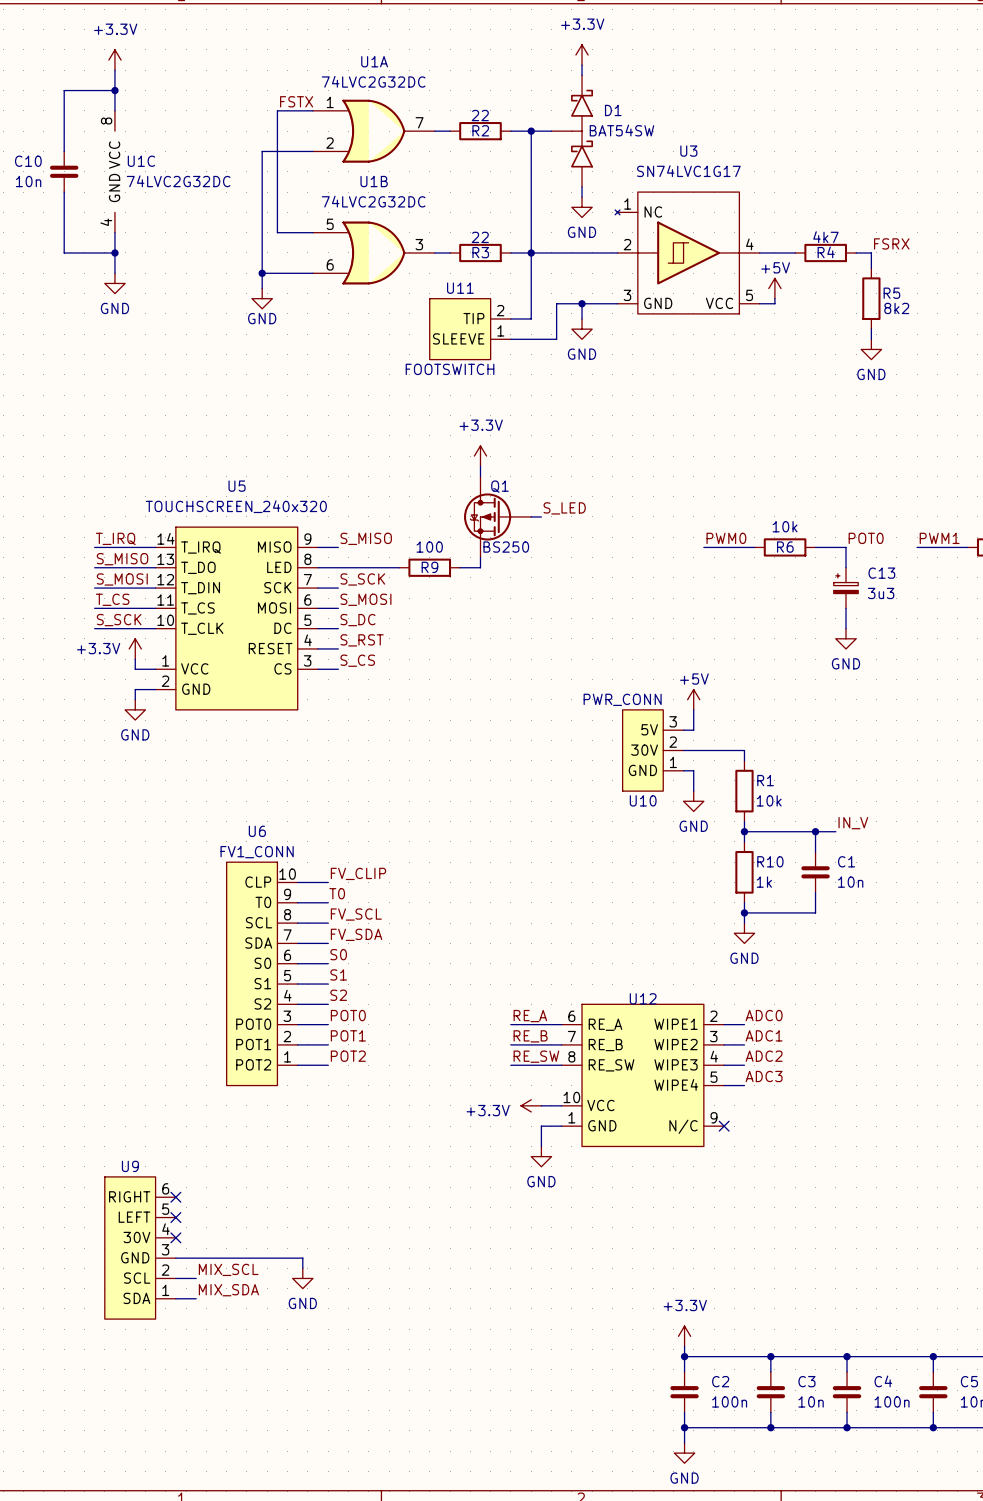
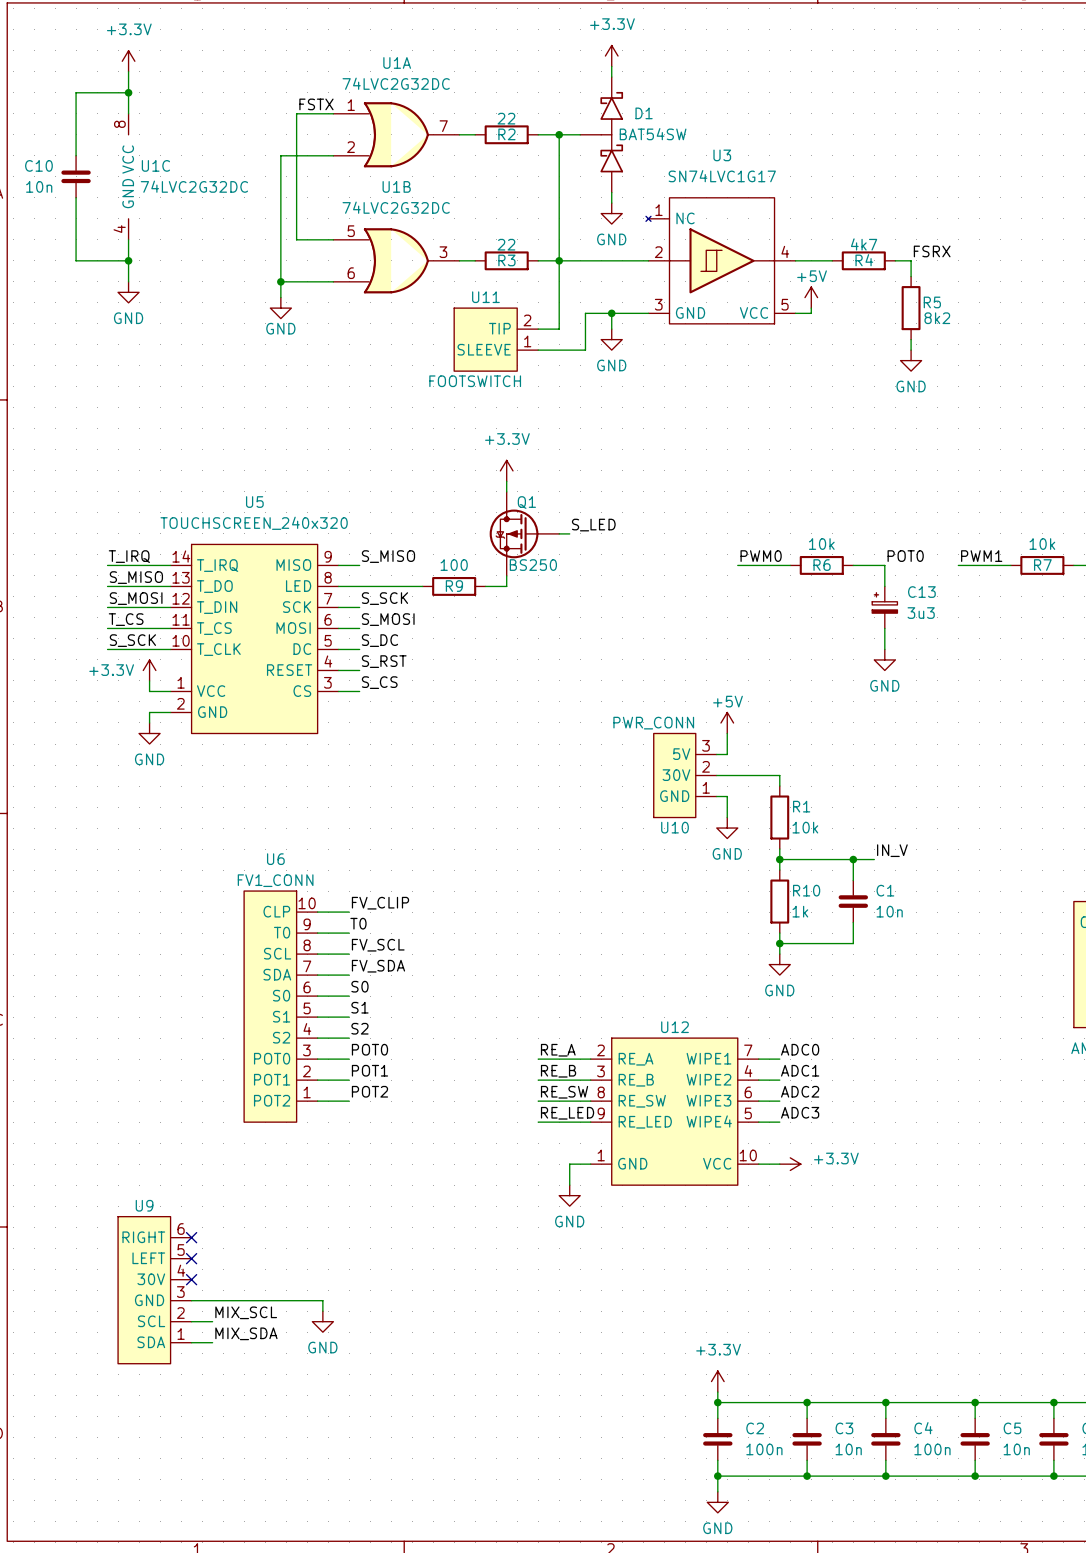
U12 symbol: [561, 1004, 725, 1147] -> [590, 1038, 759, 1186]
label: none -> RE_LED (567, 1113)
wire: none -> (538, 1122) (590, 1122)
power symbol: +3.3V (531, 1105) -> none
wire: (541, 1105) (561, 1105) -> (758, 1164) (779, 1164)
no-connect mark: (724, 1126) -> none
power symbol: none -> +3.3V (790, 1164)

